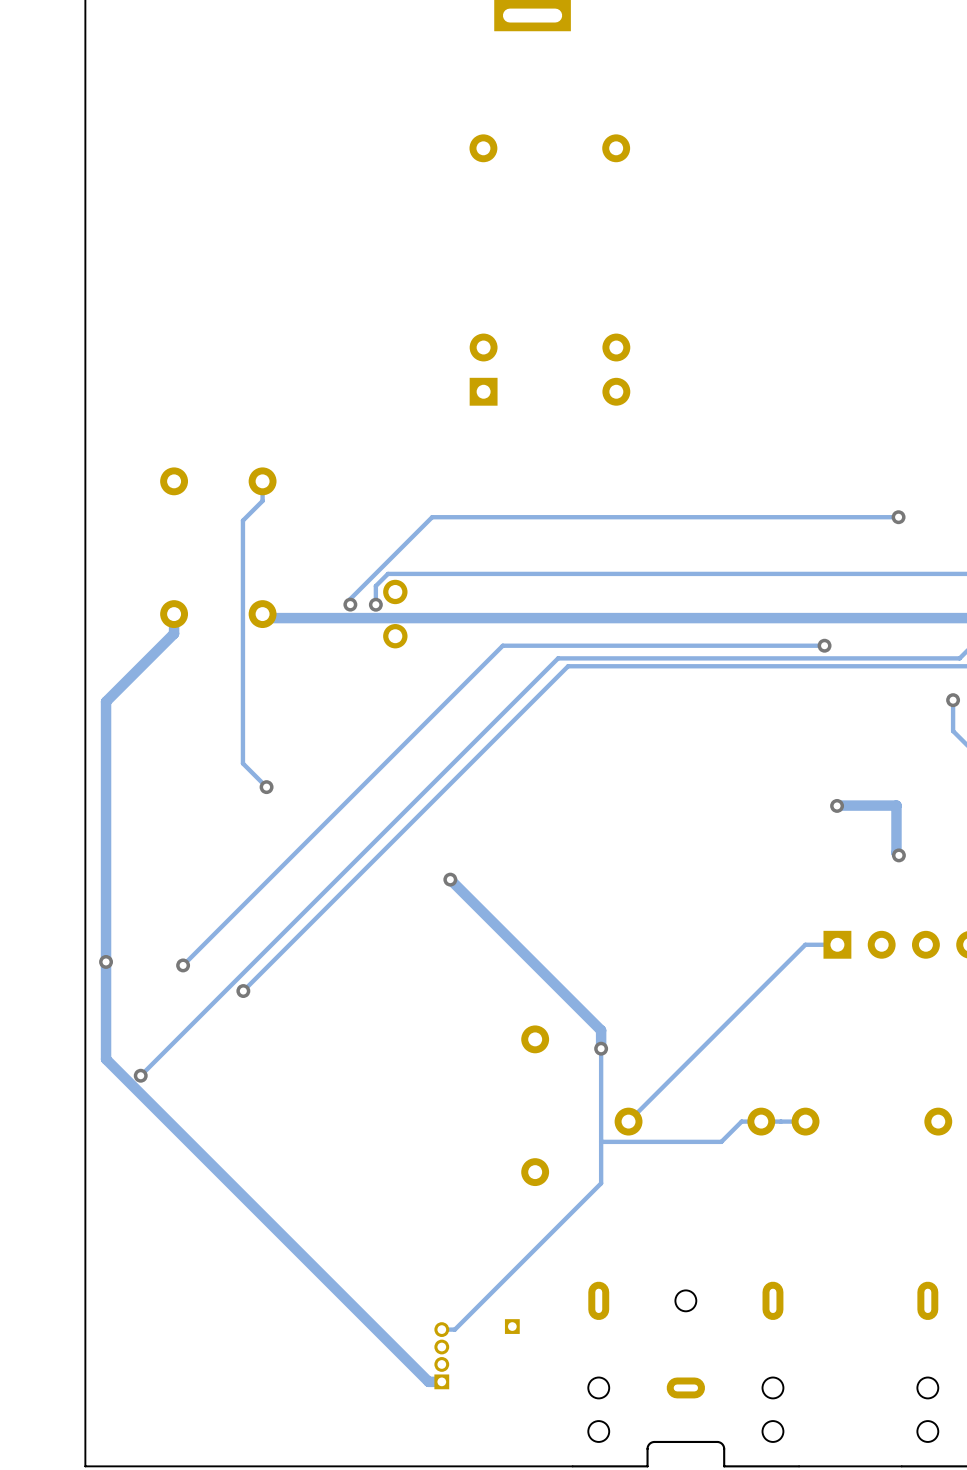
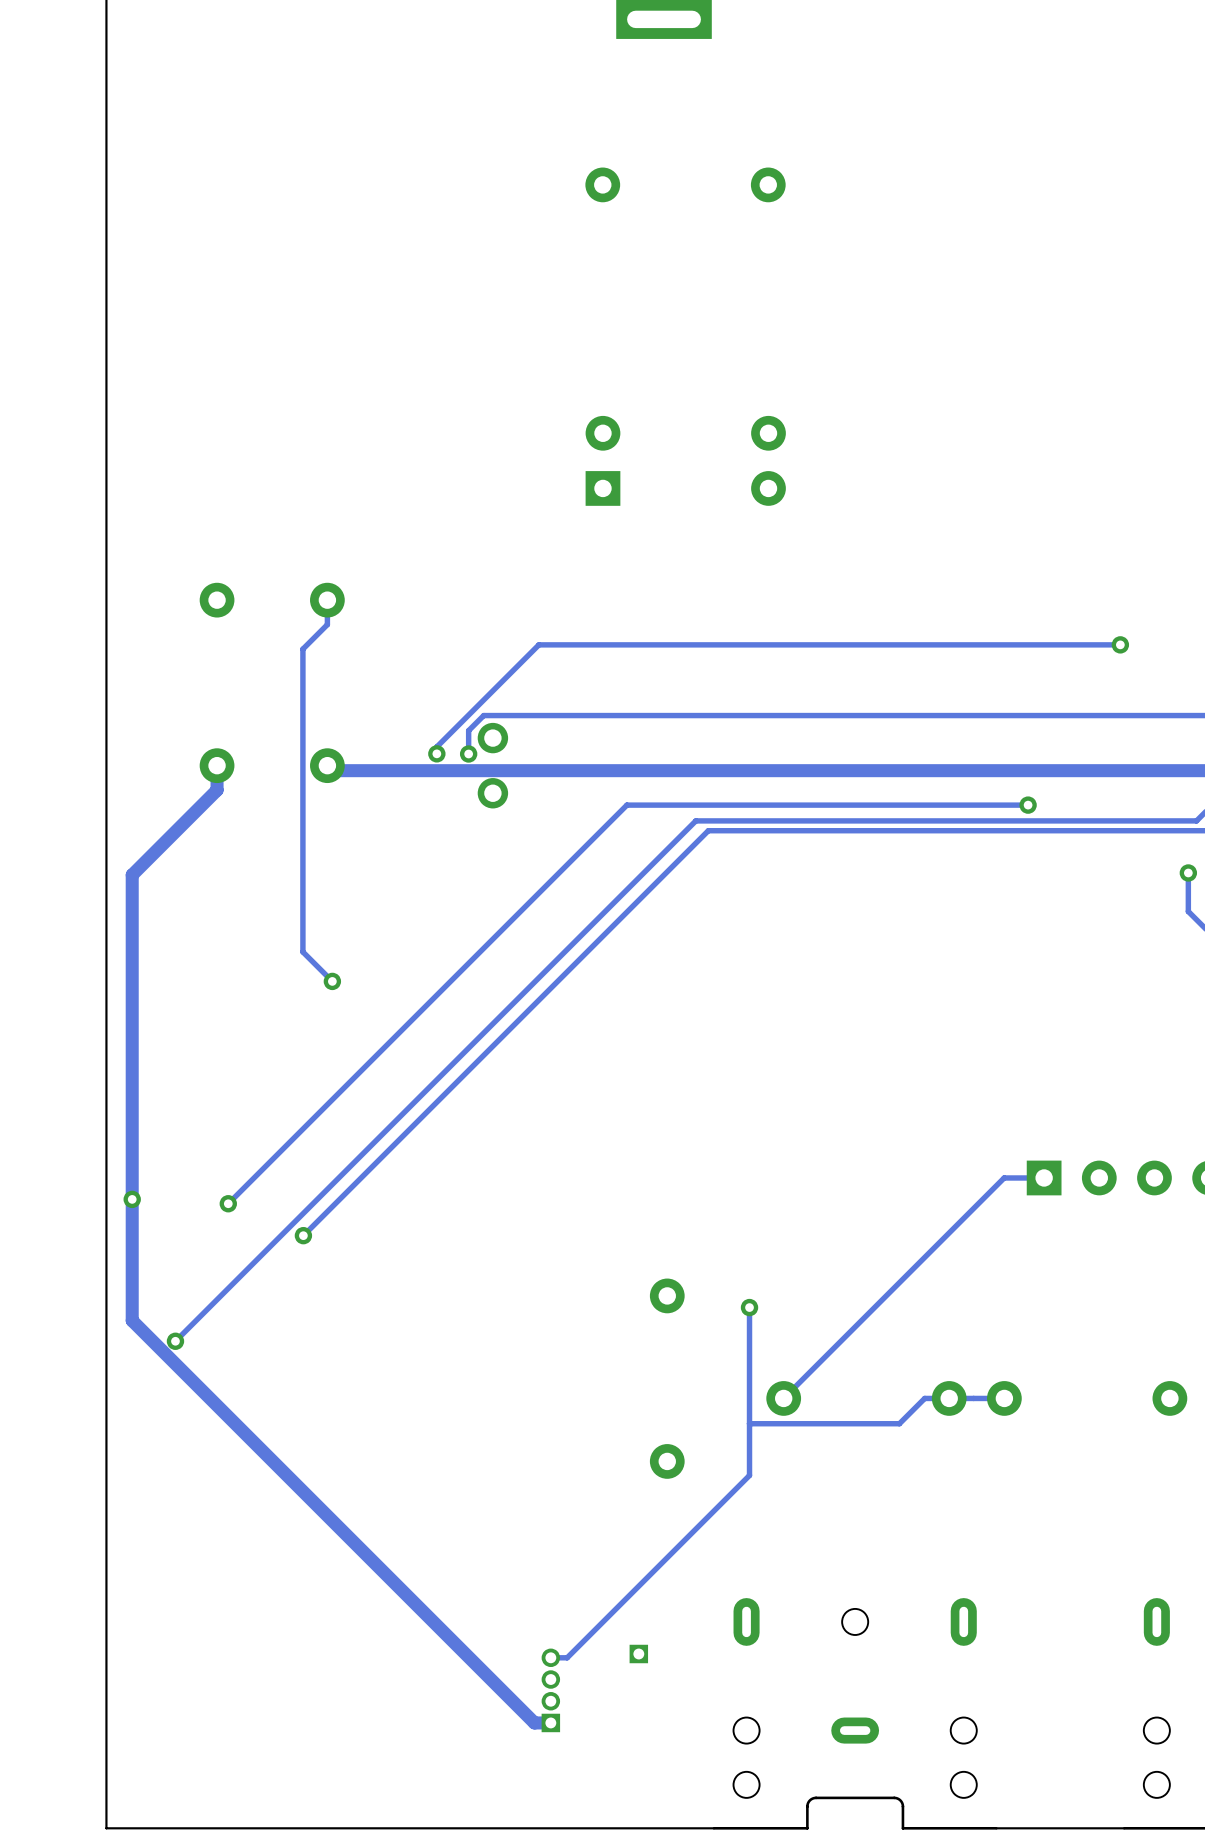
track: (837, 805) (896, 805) (896, 852) (898, 855) -> none
via: (837, 805) -> none
via: (898, 855) -> none
track: (450, 879) (601, 1030) (601, 1048) -> none
via: (450, 879) -> none

